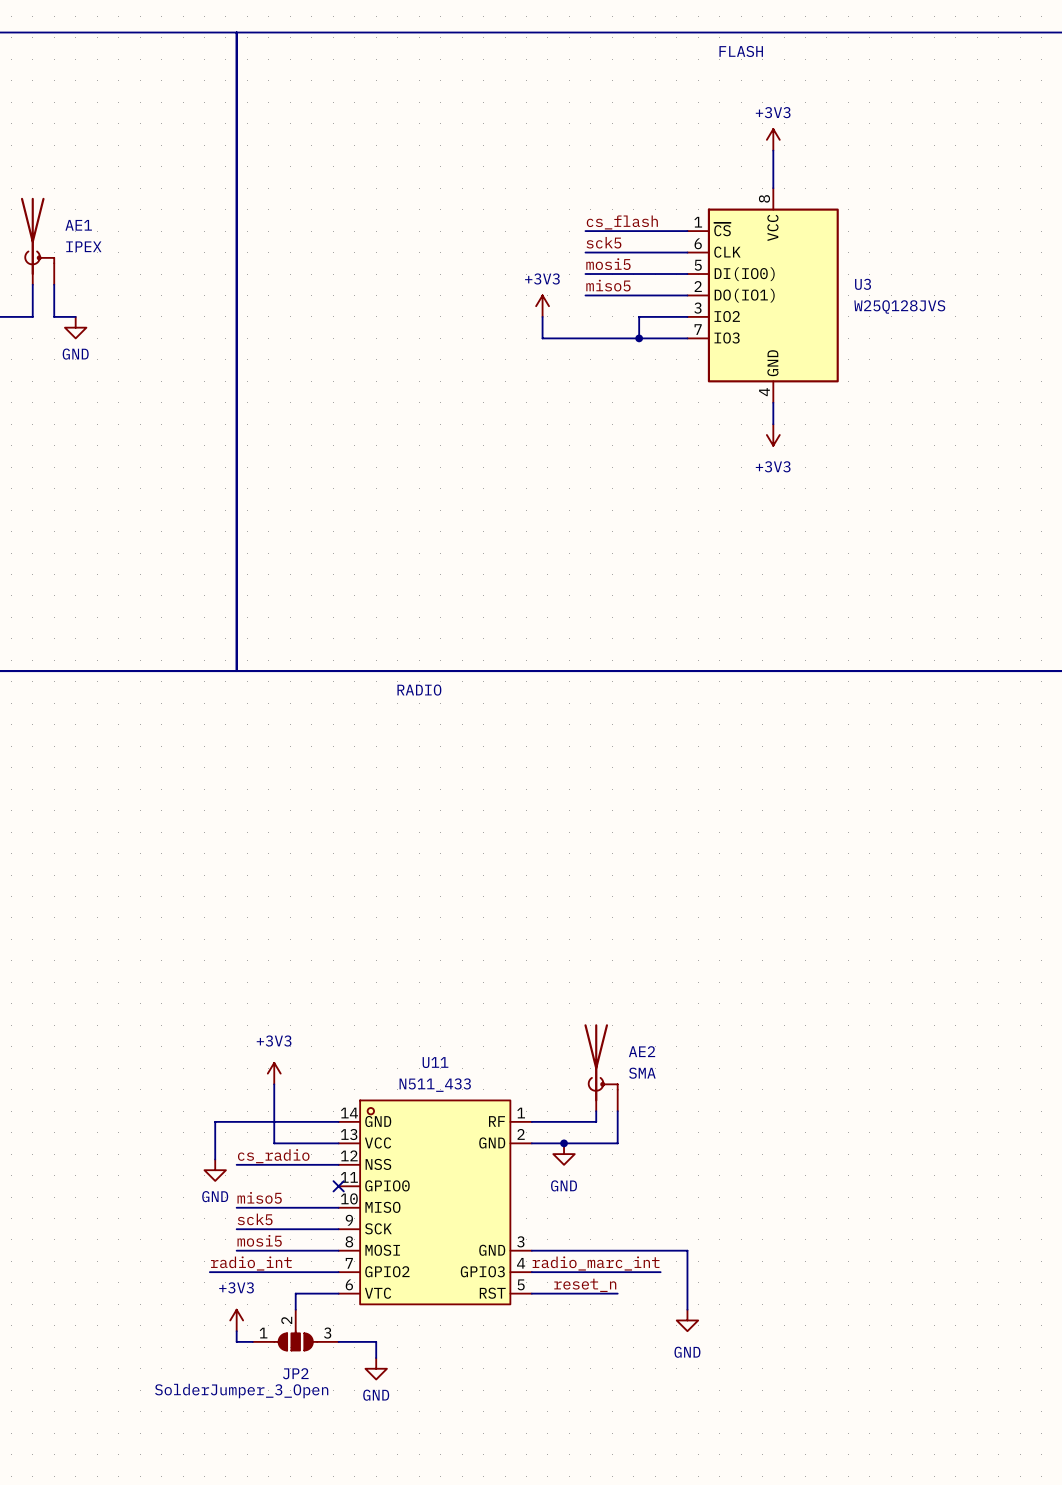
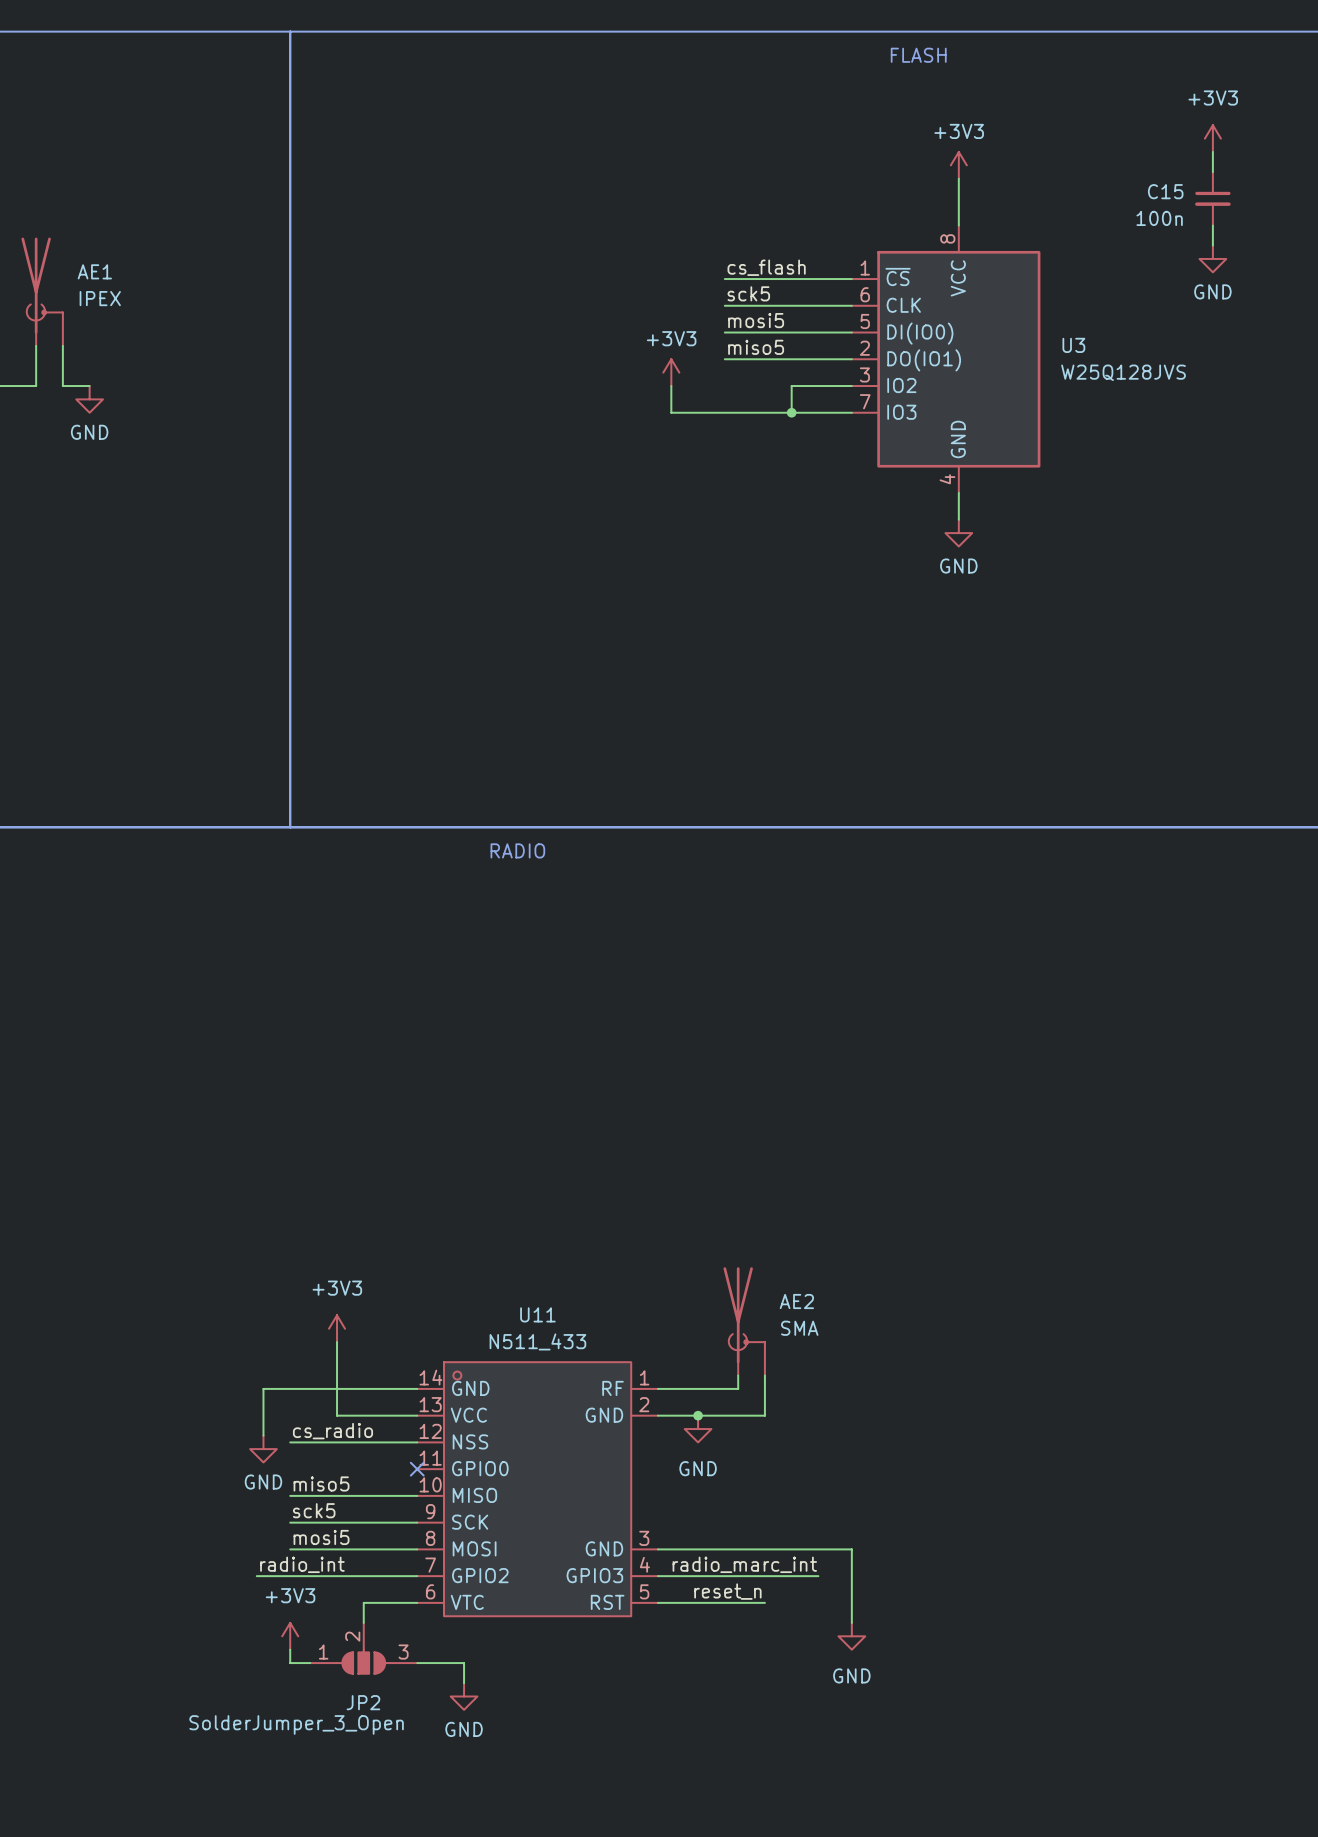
power symbol: none -> +3V3 (1212, 138)
wire: none -> (1212, 151) (1212, 172)
C15: none -> 100n (1212, 198)
wire: none -> (1212, 225) (1212, 245)
power symbol: none -> GND (1212, 258)
power symbol: +3V3 (773, 434) -> GND (958, 533)

